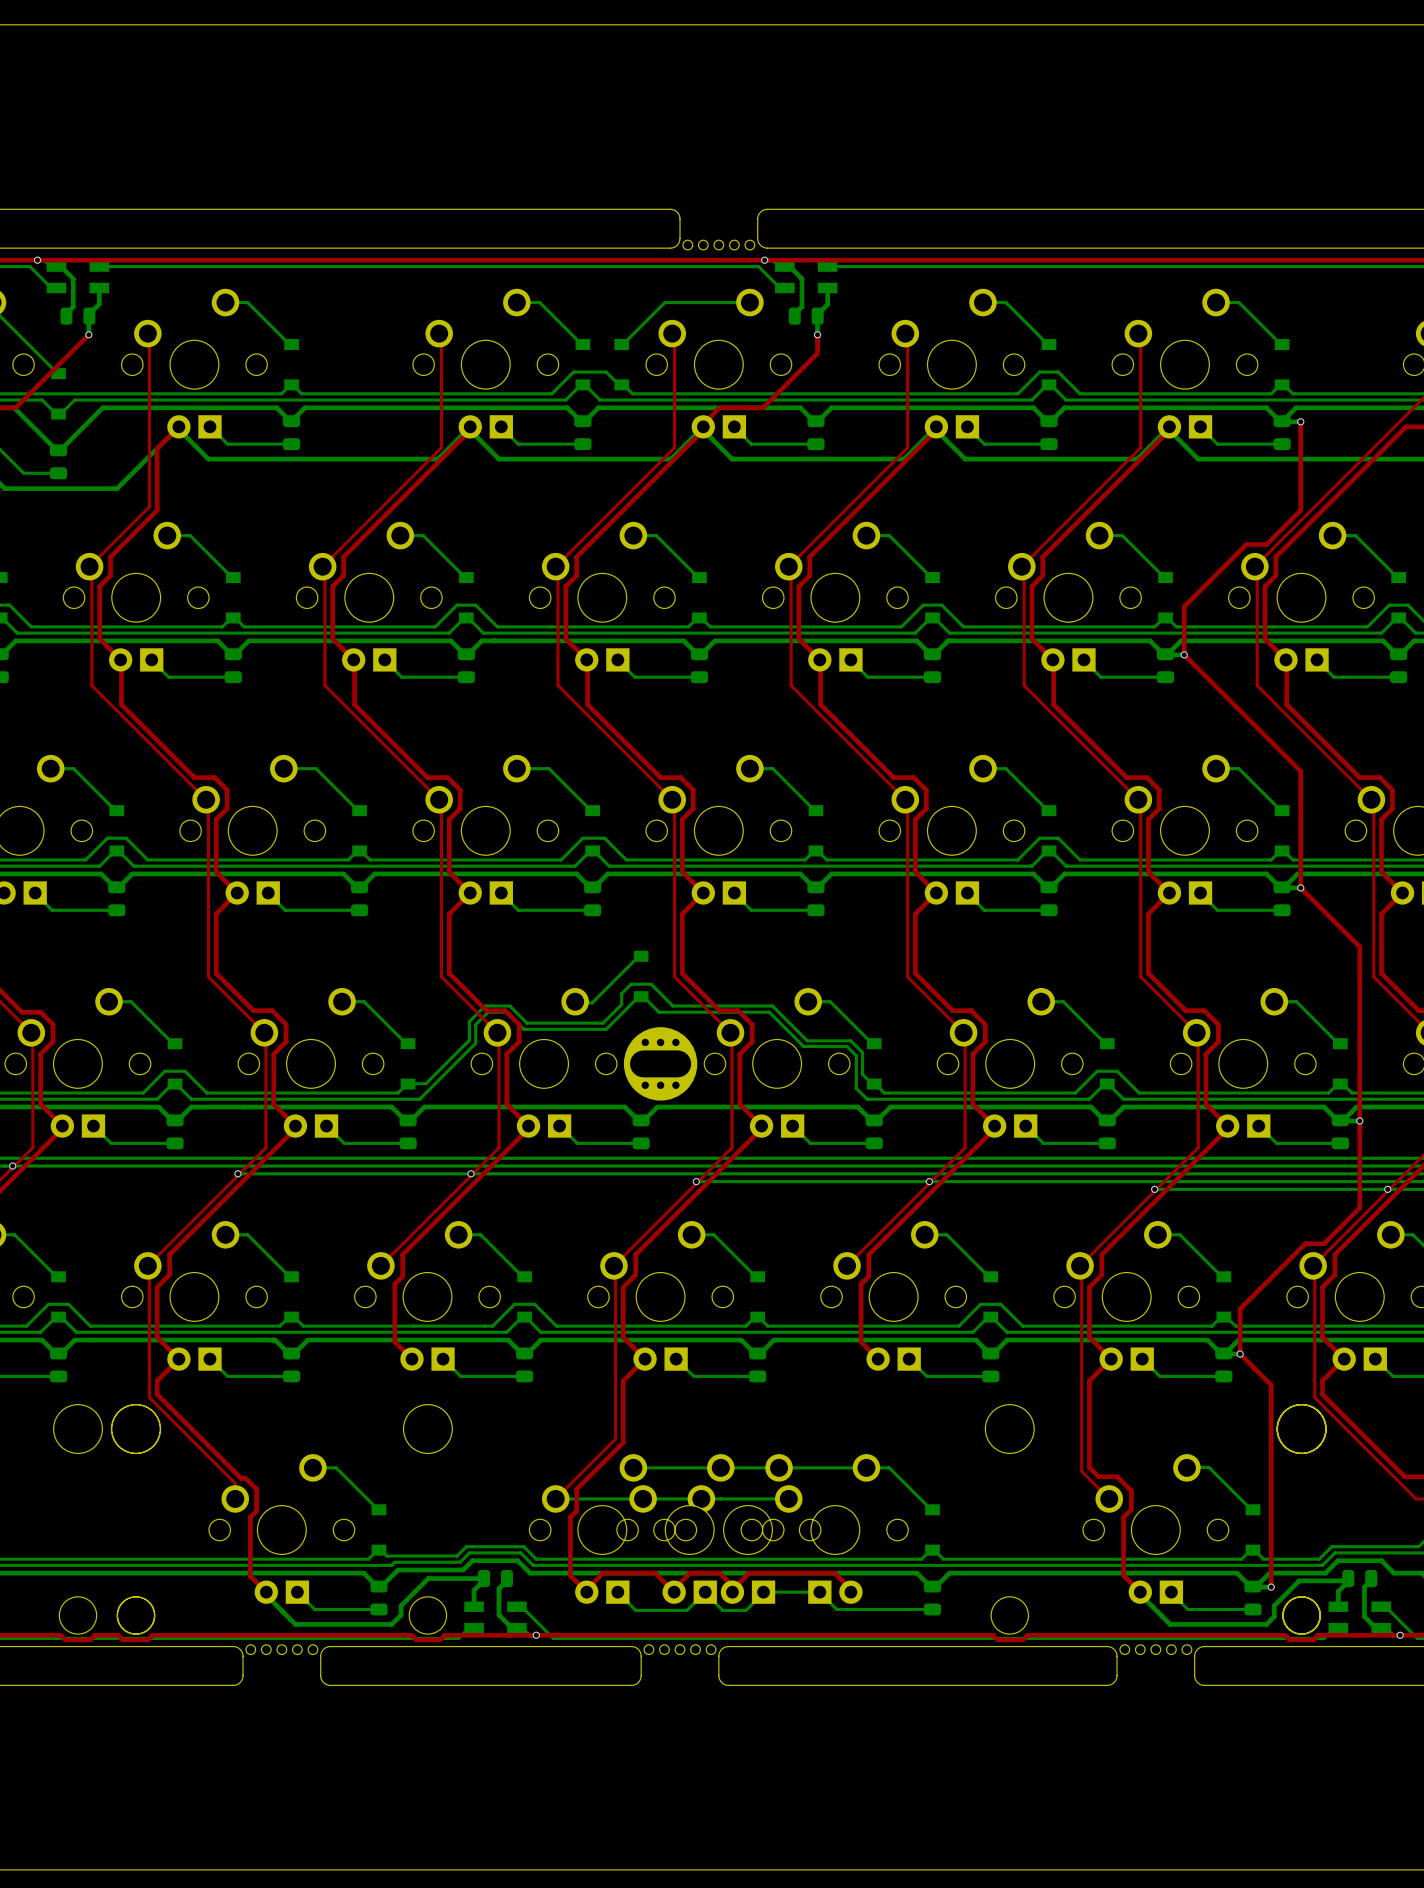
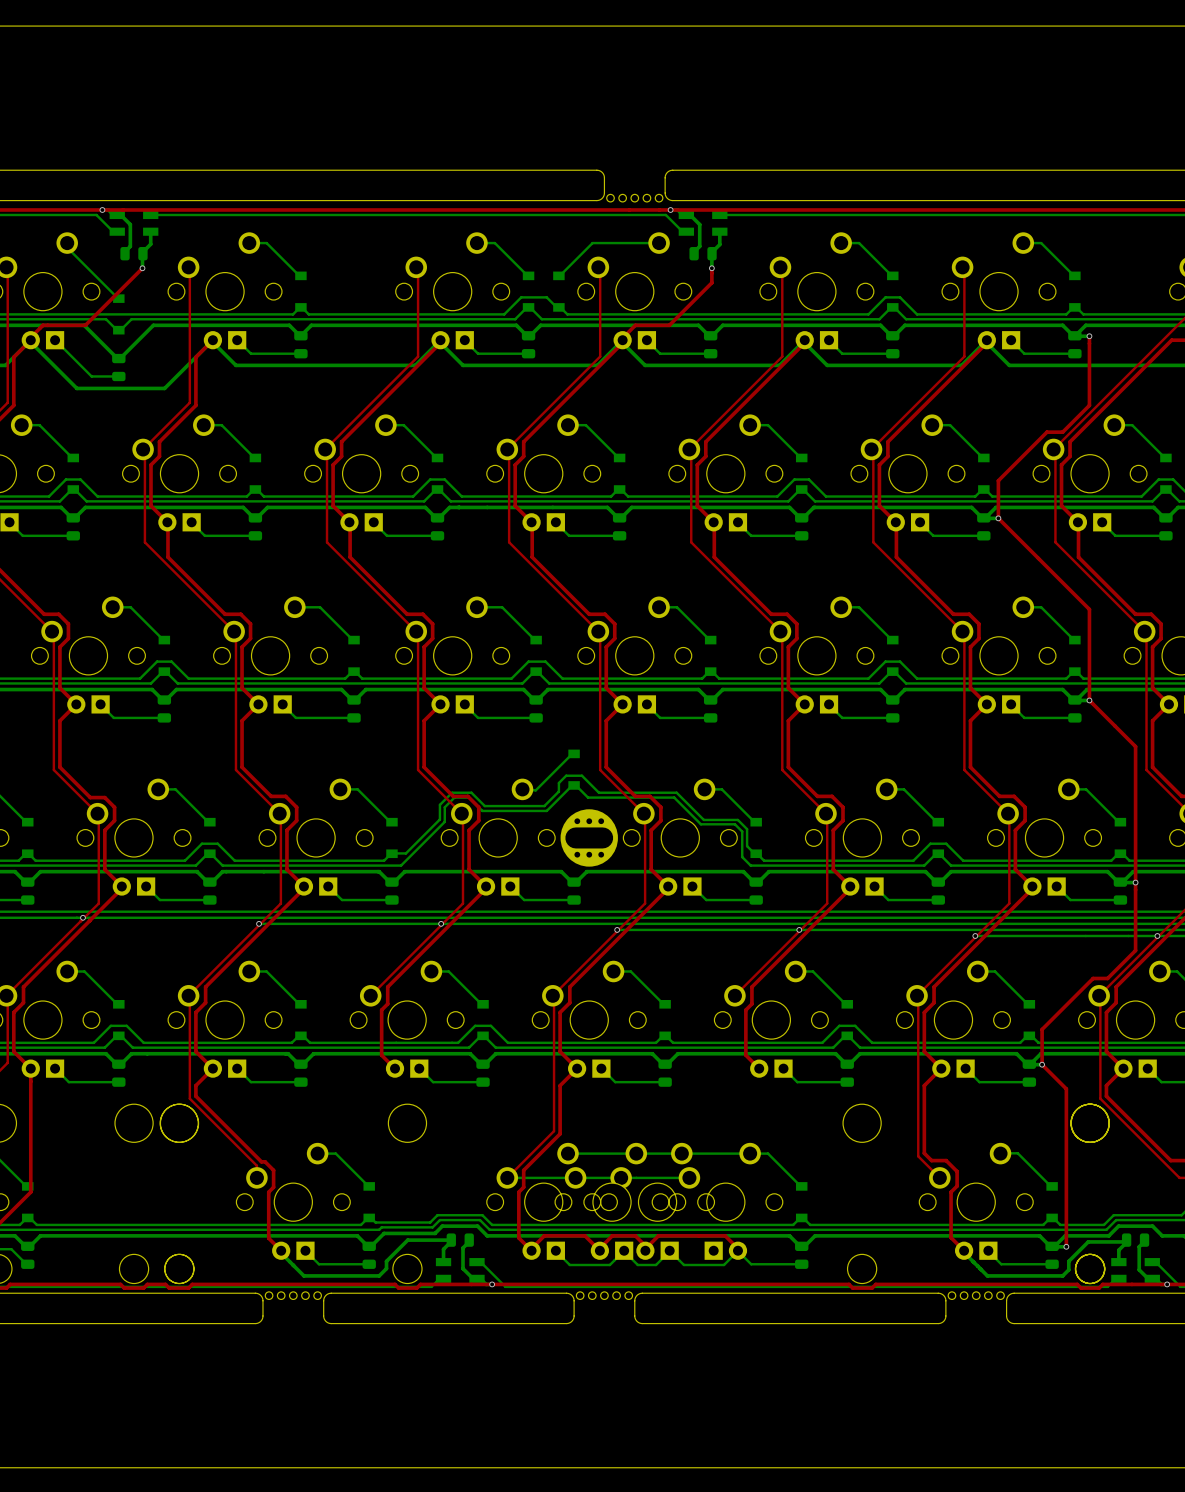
bottom track: (763, 1592) (819, 1592) (836, 1609) (867, 1609) -> (669, 1250) (683, 1265) (724, 1265) (737, 1251)
bottom track: none -> (737, 1251) (751, 1264)

